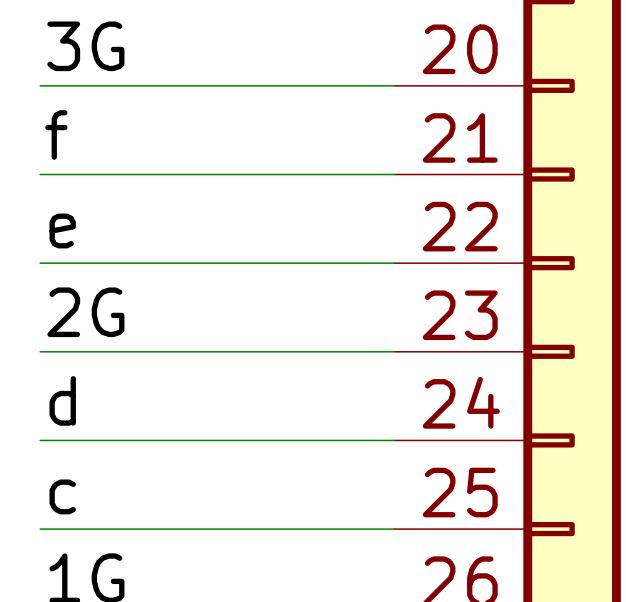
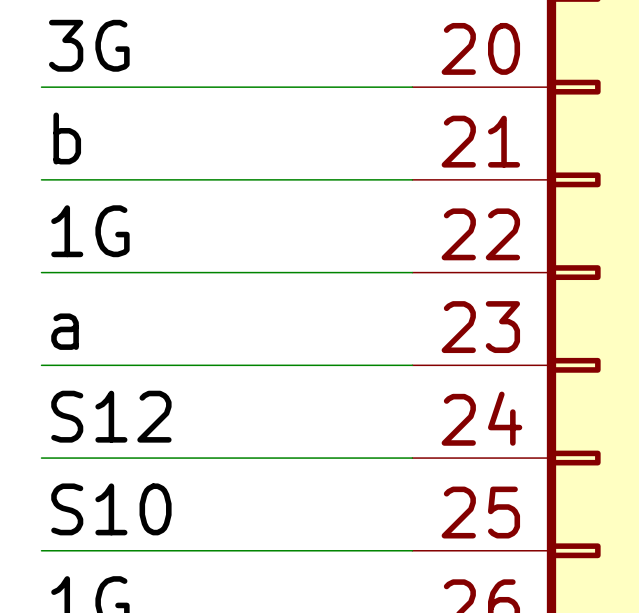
label: f (56, 134) -> b (67, 138)
label: e (62, 230) -> 1G (90, 231)
label: 2G (85, 312) -> a (65, 331)
label: d (62, 400) -> S12 (111, 416)
label: c (62, 496) -> S10 (111, 509)

